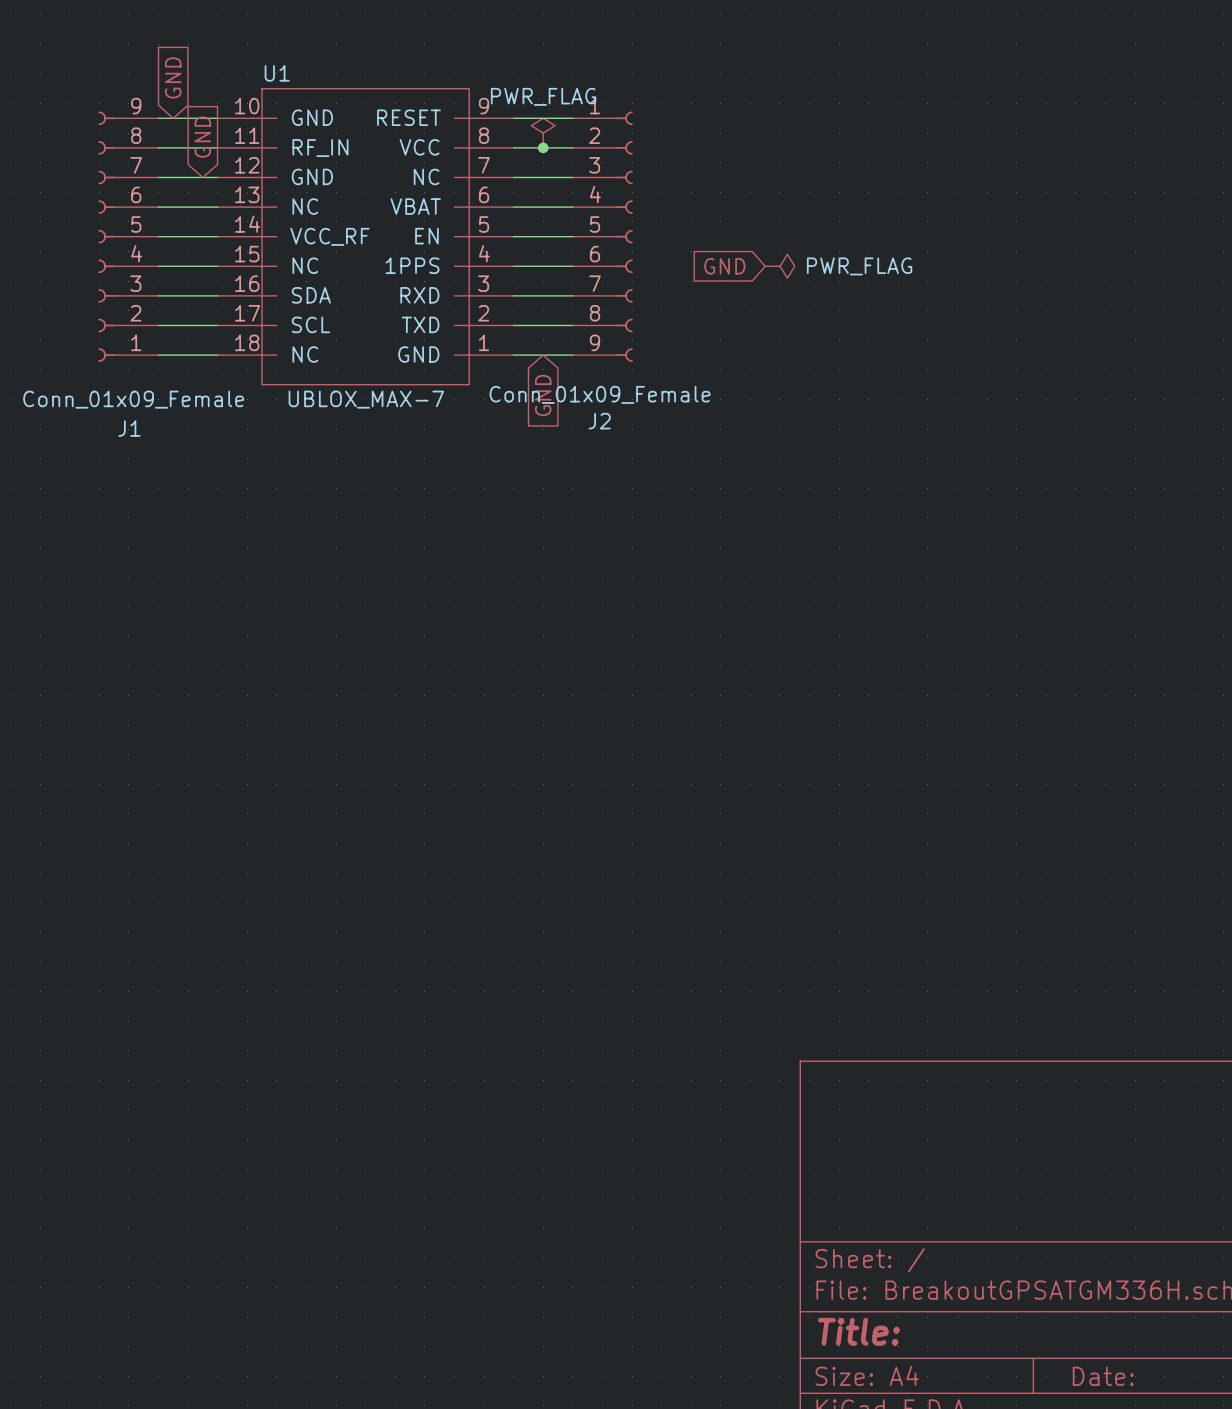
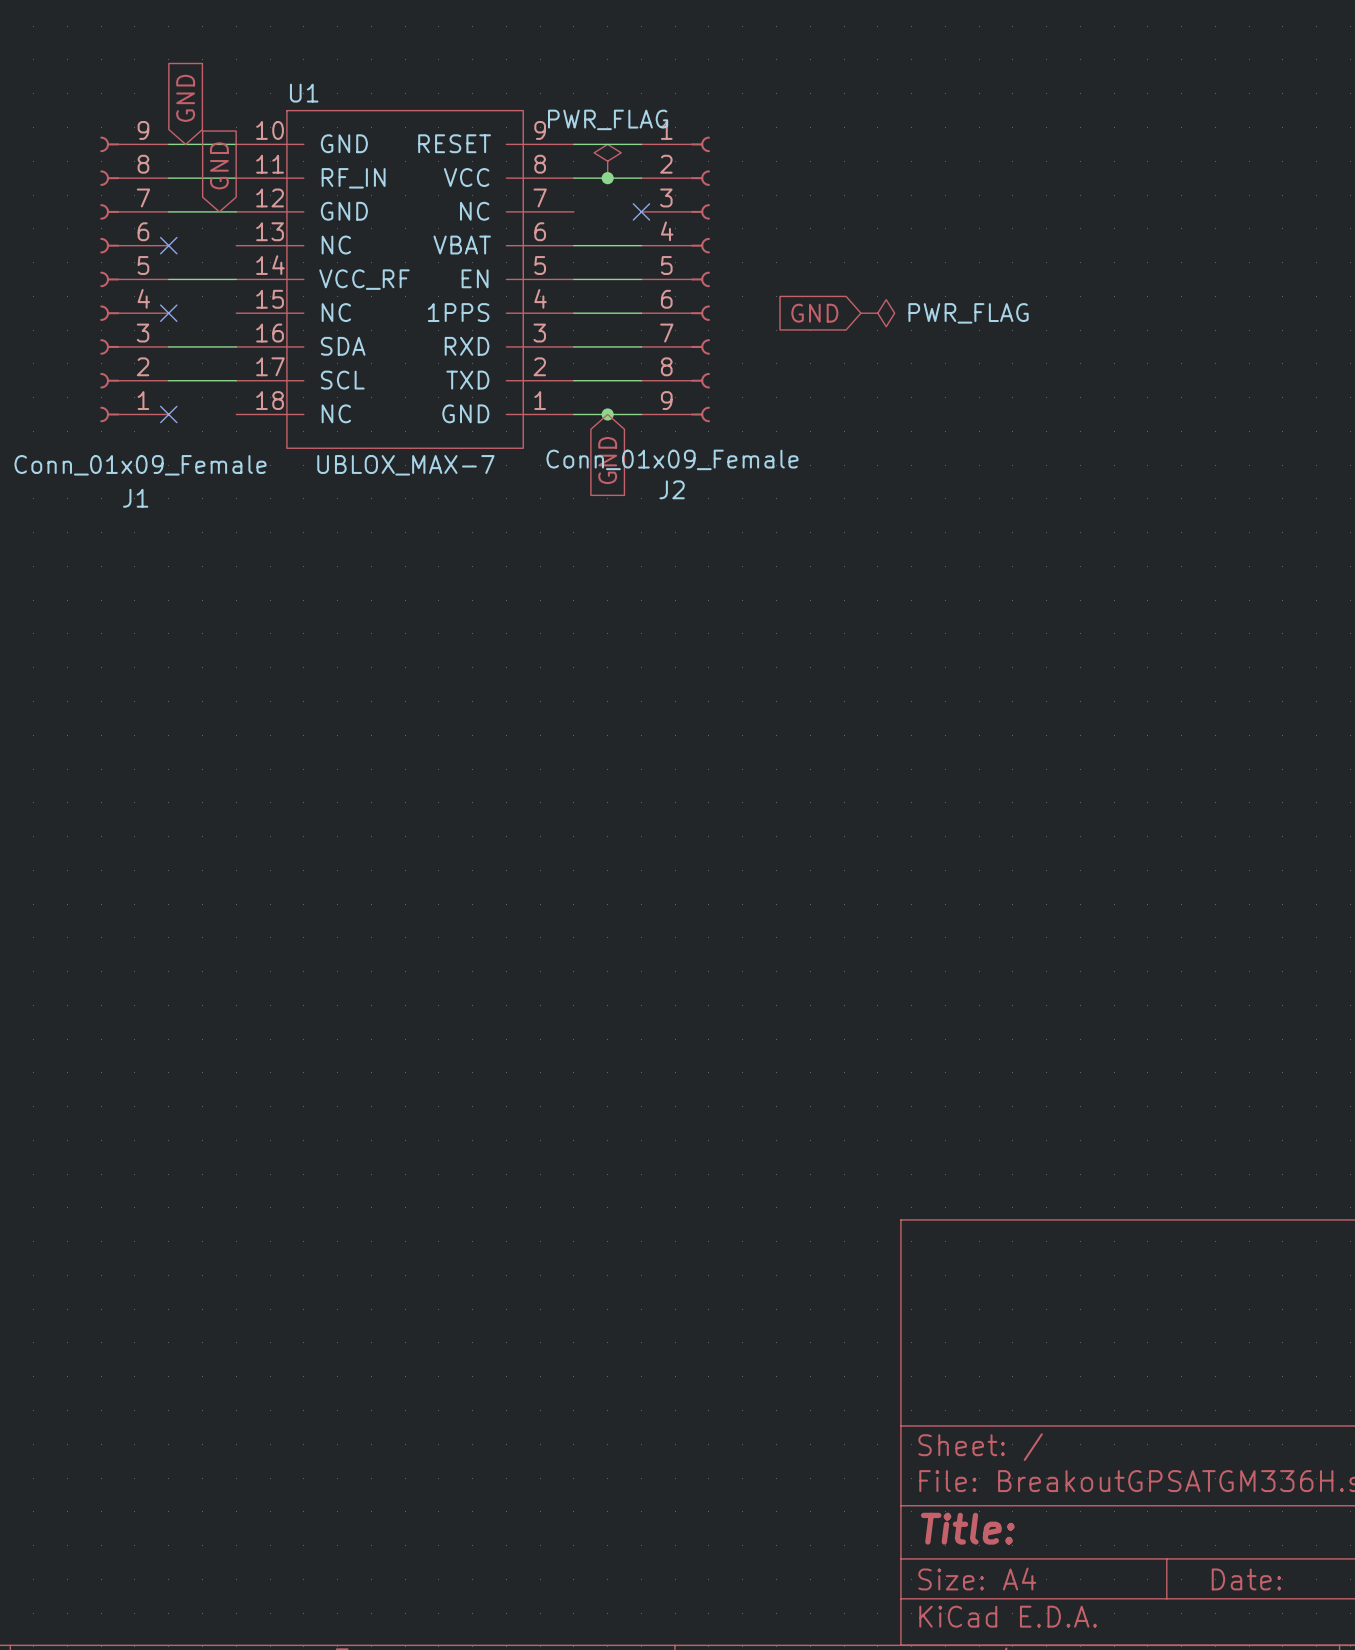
wire: (513, 177) (572, 177) -> none
no-connect mark: none -> (641, 211)
wire: (158, 207) (217, 207) -> none
no-connect mark: none -> (168, 245)
wire: (158, 266) (217, 266) -> none
no-connect mark: none -> (168, 313)
wire: (158, 355) (217, 355) -> none
no-connect mark: none -> (168, 414)
junction: none -> (607, 414)

